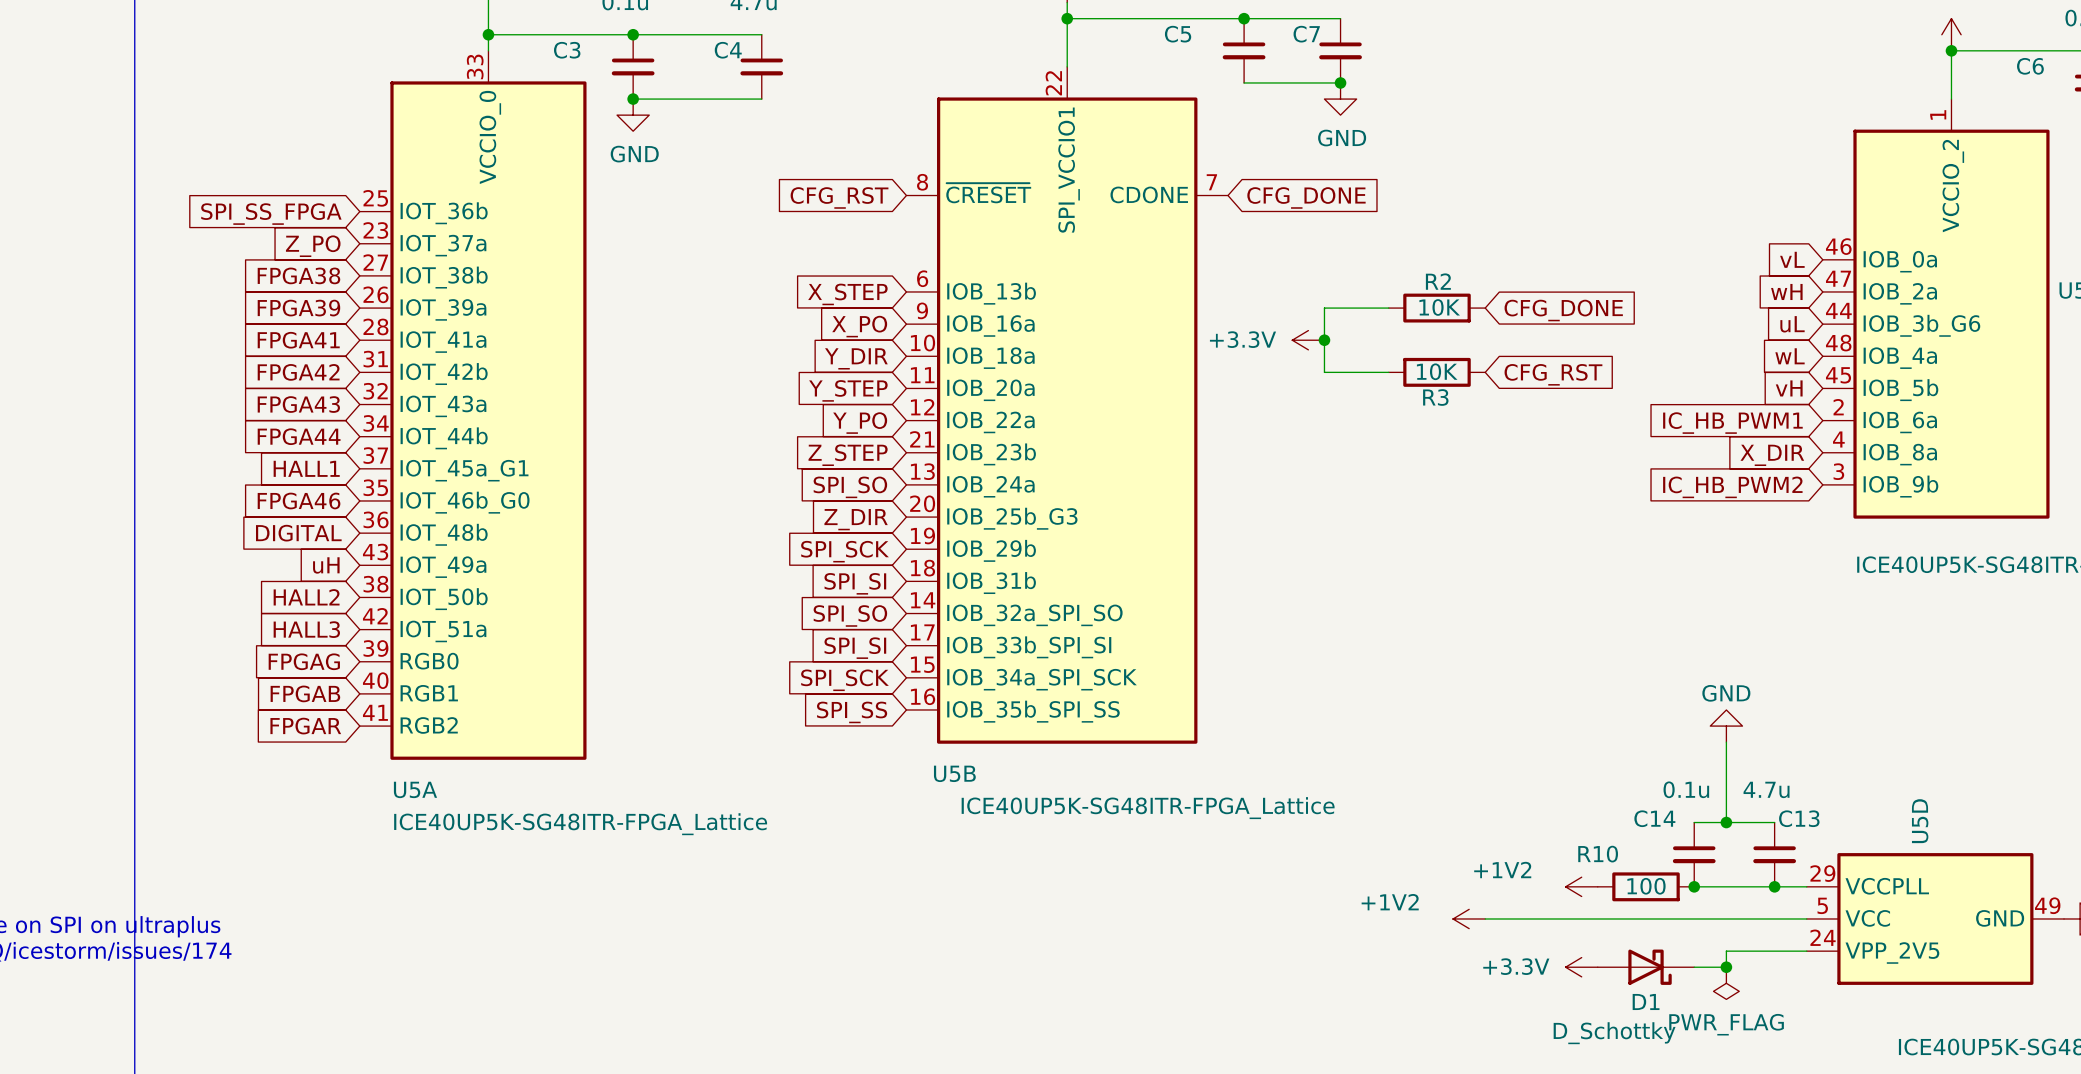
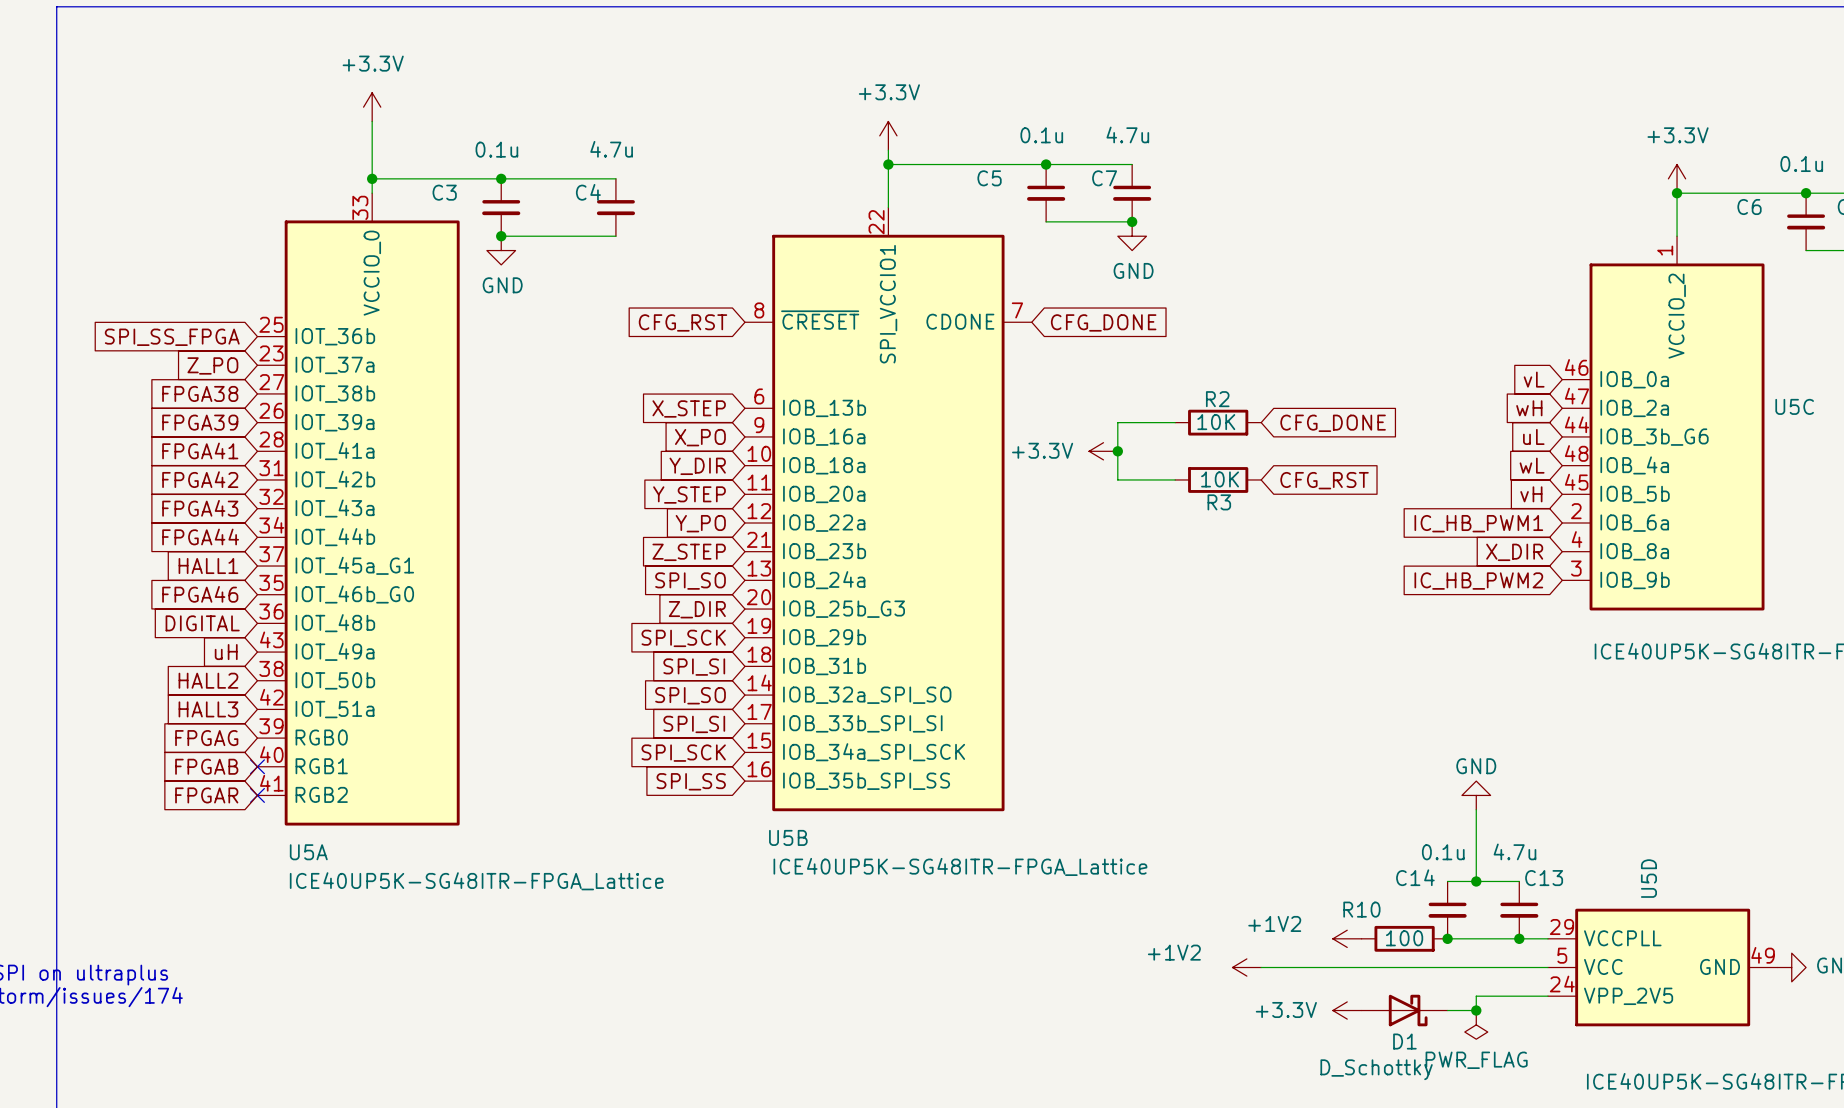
no-connect mark: none -> (257, 766)
no-connect mark: none -> (257, 795)

